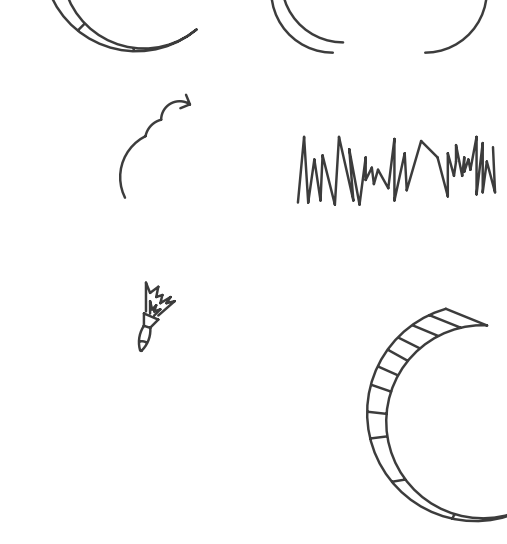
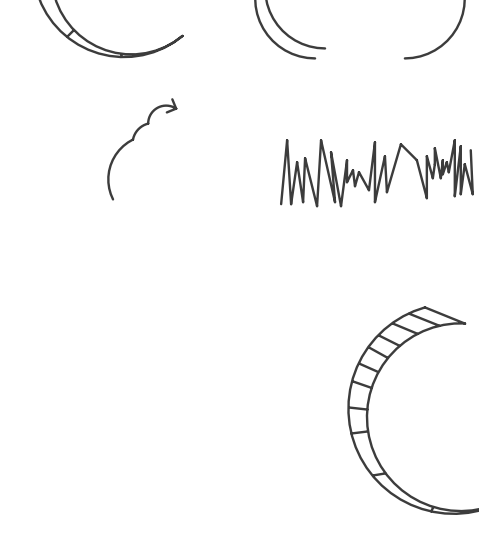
line: (145, 311) (145, 282) (150, 292) (158, 286) (156, 297) (162, 294) (160, 303) (170, 297) (166, 303) (174, 301) (158, 315) -> none
line: (150, 313) (150, 301) (152, 309) (156, 305) (154, 311) (160, 309) (154, 315) -> none
line: (143, 325) (150, 327) (158, 319) (143, 313) (143, 325) -> none
line: (143, 325) (139, 337) (140, 350) -> none
line: (150, 327) (148, 340) (141, 350) -> none
line: (139, 341) (145, 342) -> none

